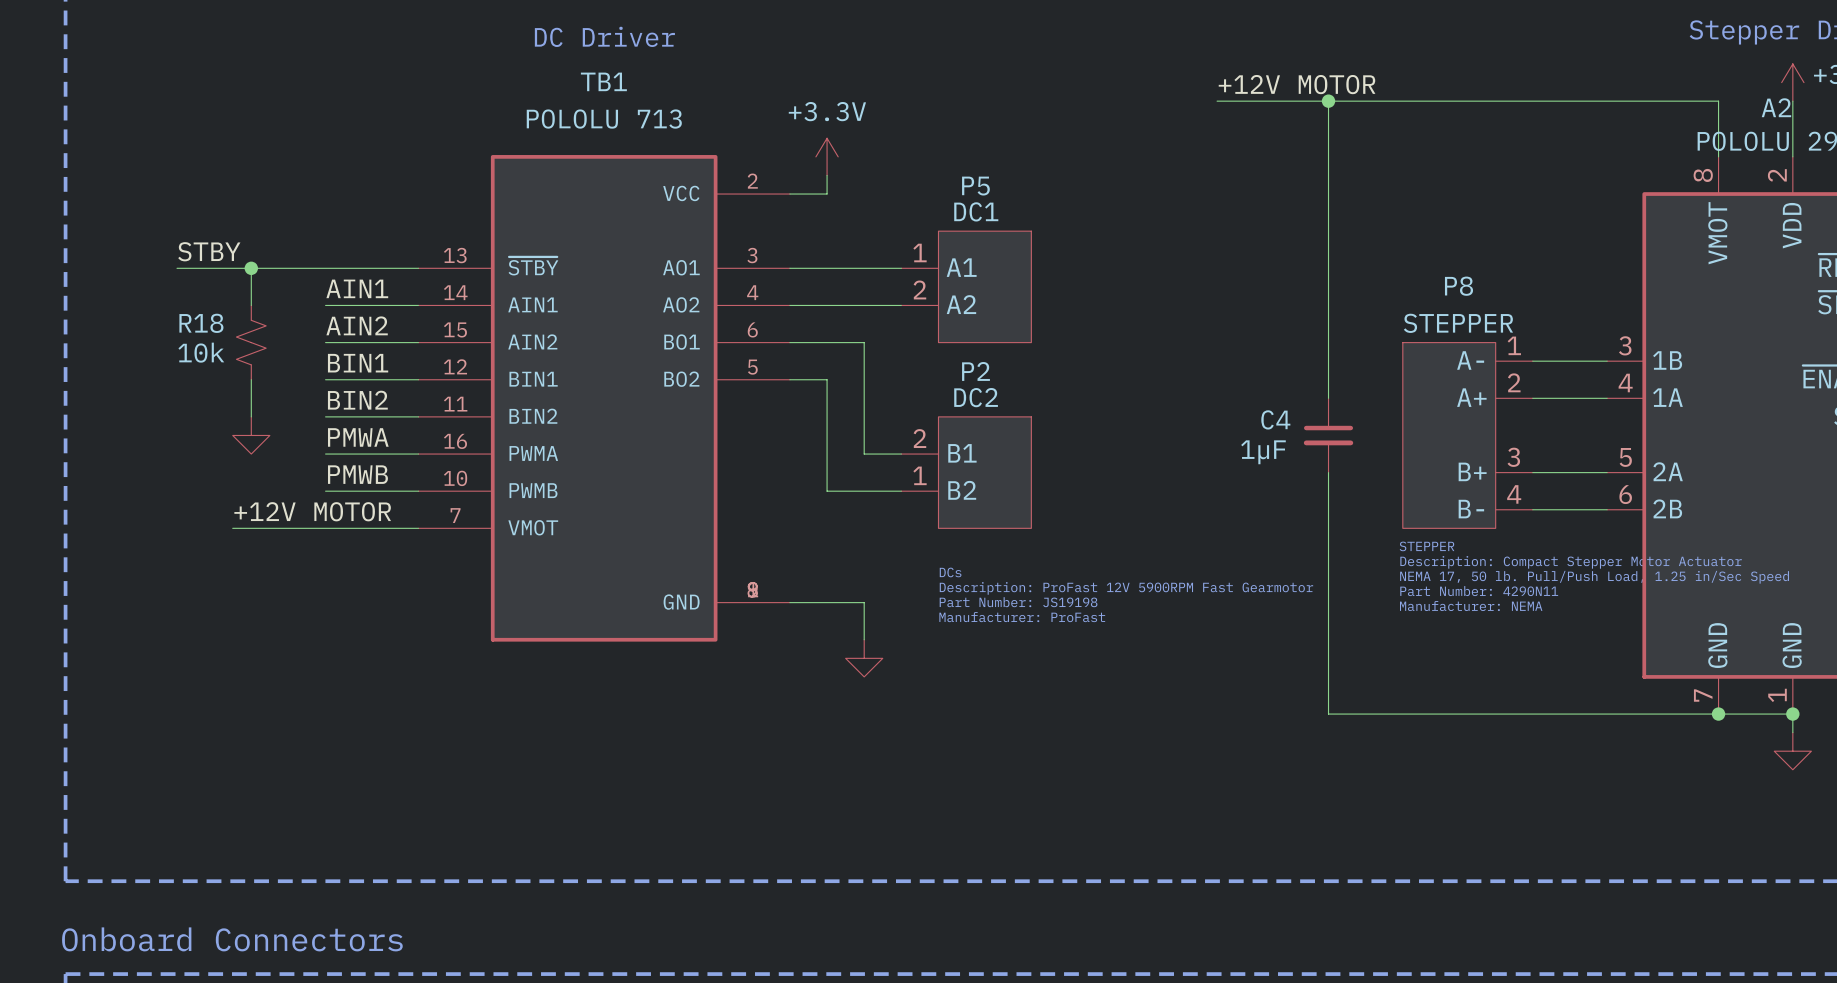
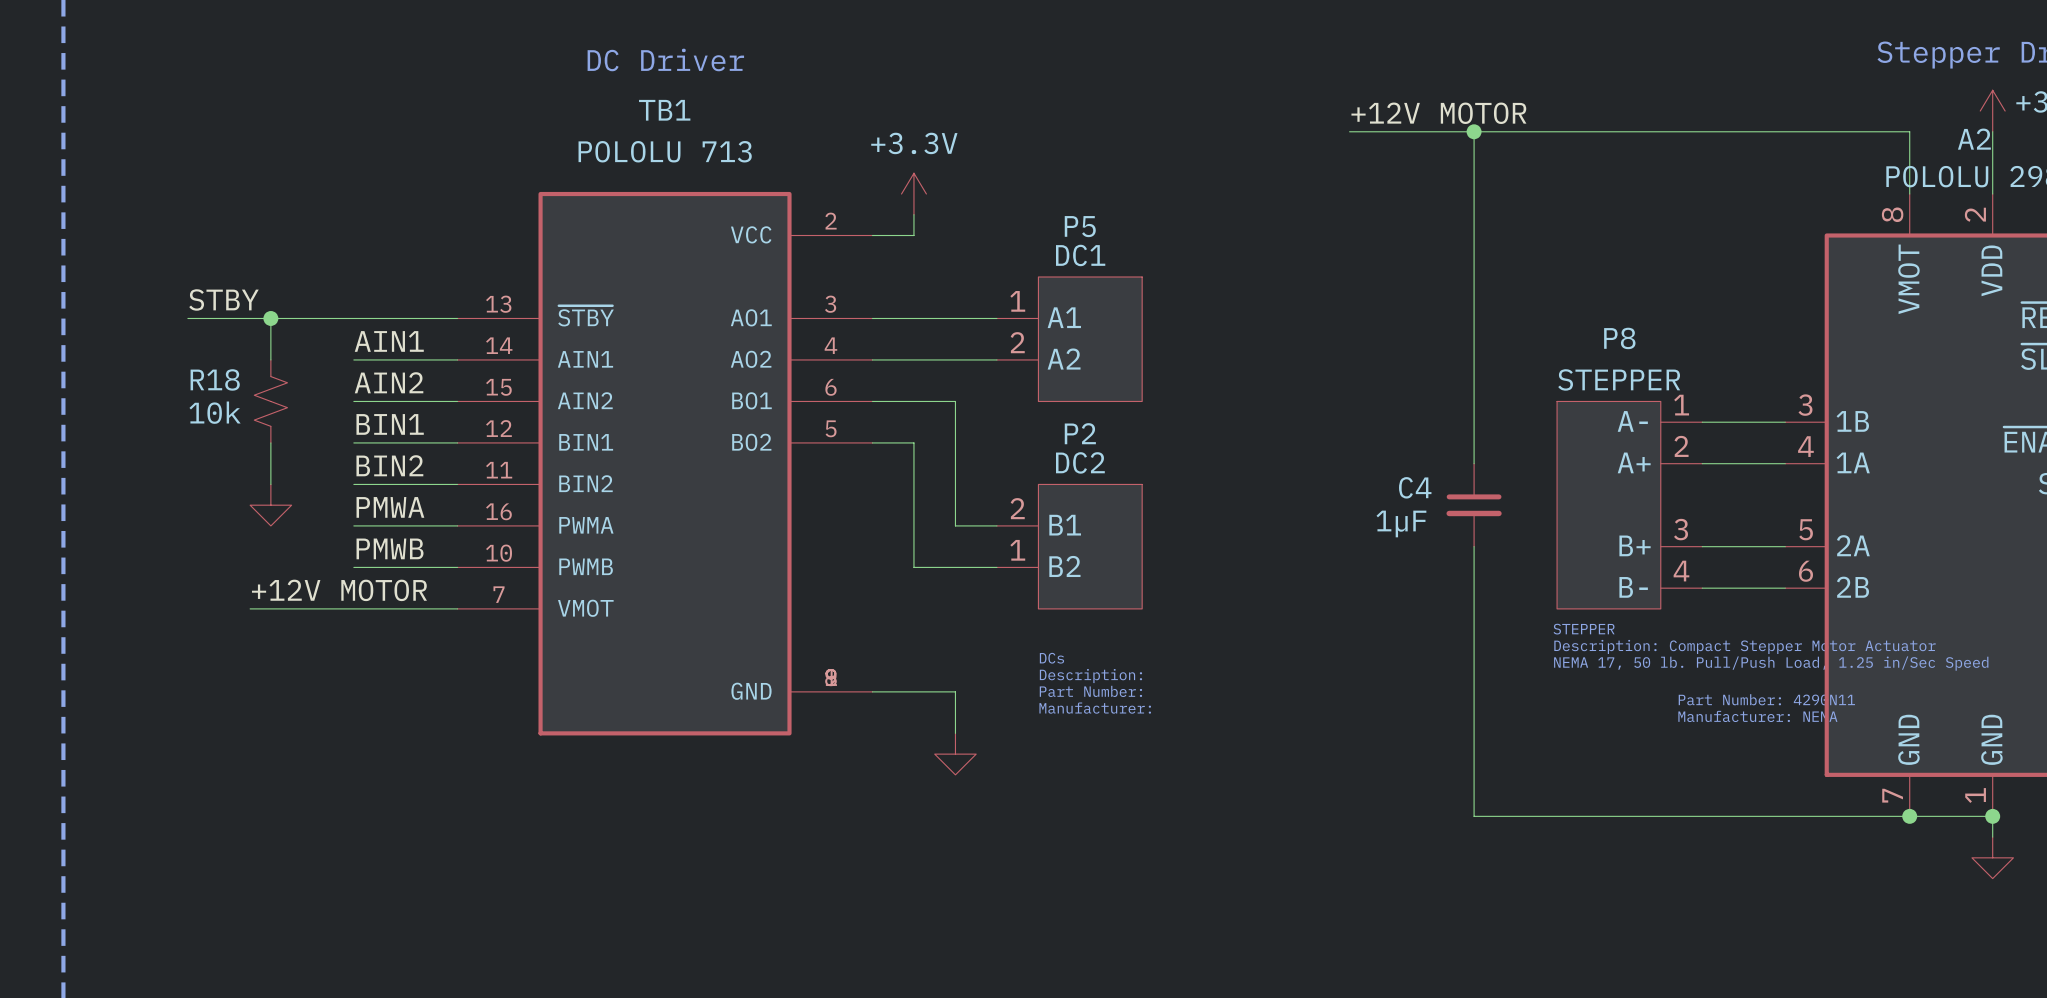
text: Description: ProFast 12V 5900RPM Fast Gearmotor (1126, 588) -> Description: (1090, 676)
text position: Part Number: 4290N11 (1479, 591) -> Part Number: 4290N11 (1766, 699)
text: Part Number: JS19198 (1018, 602) -> Part Number: (1090, 691)
text position: Manufacturer: NEMA (1471, 606) -> Manufacturer: NEMA (1757, 716)
text: Manufacturer: ProFast (1022, 617) -> Manufacturer: (1095, 708)

